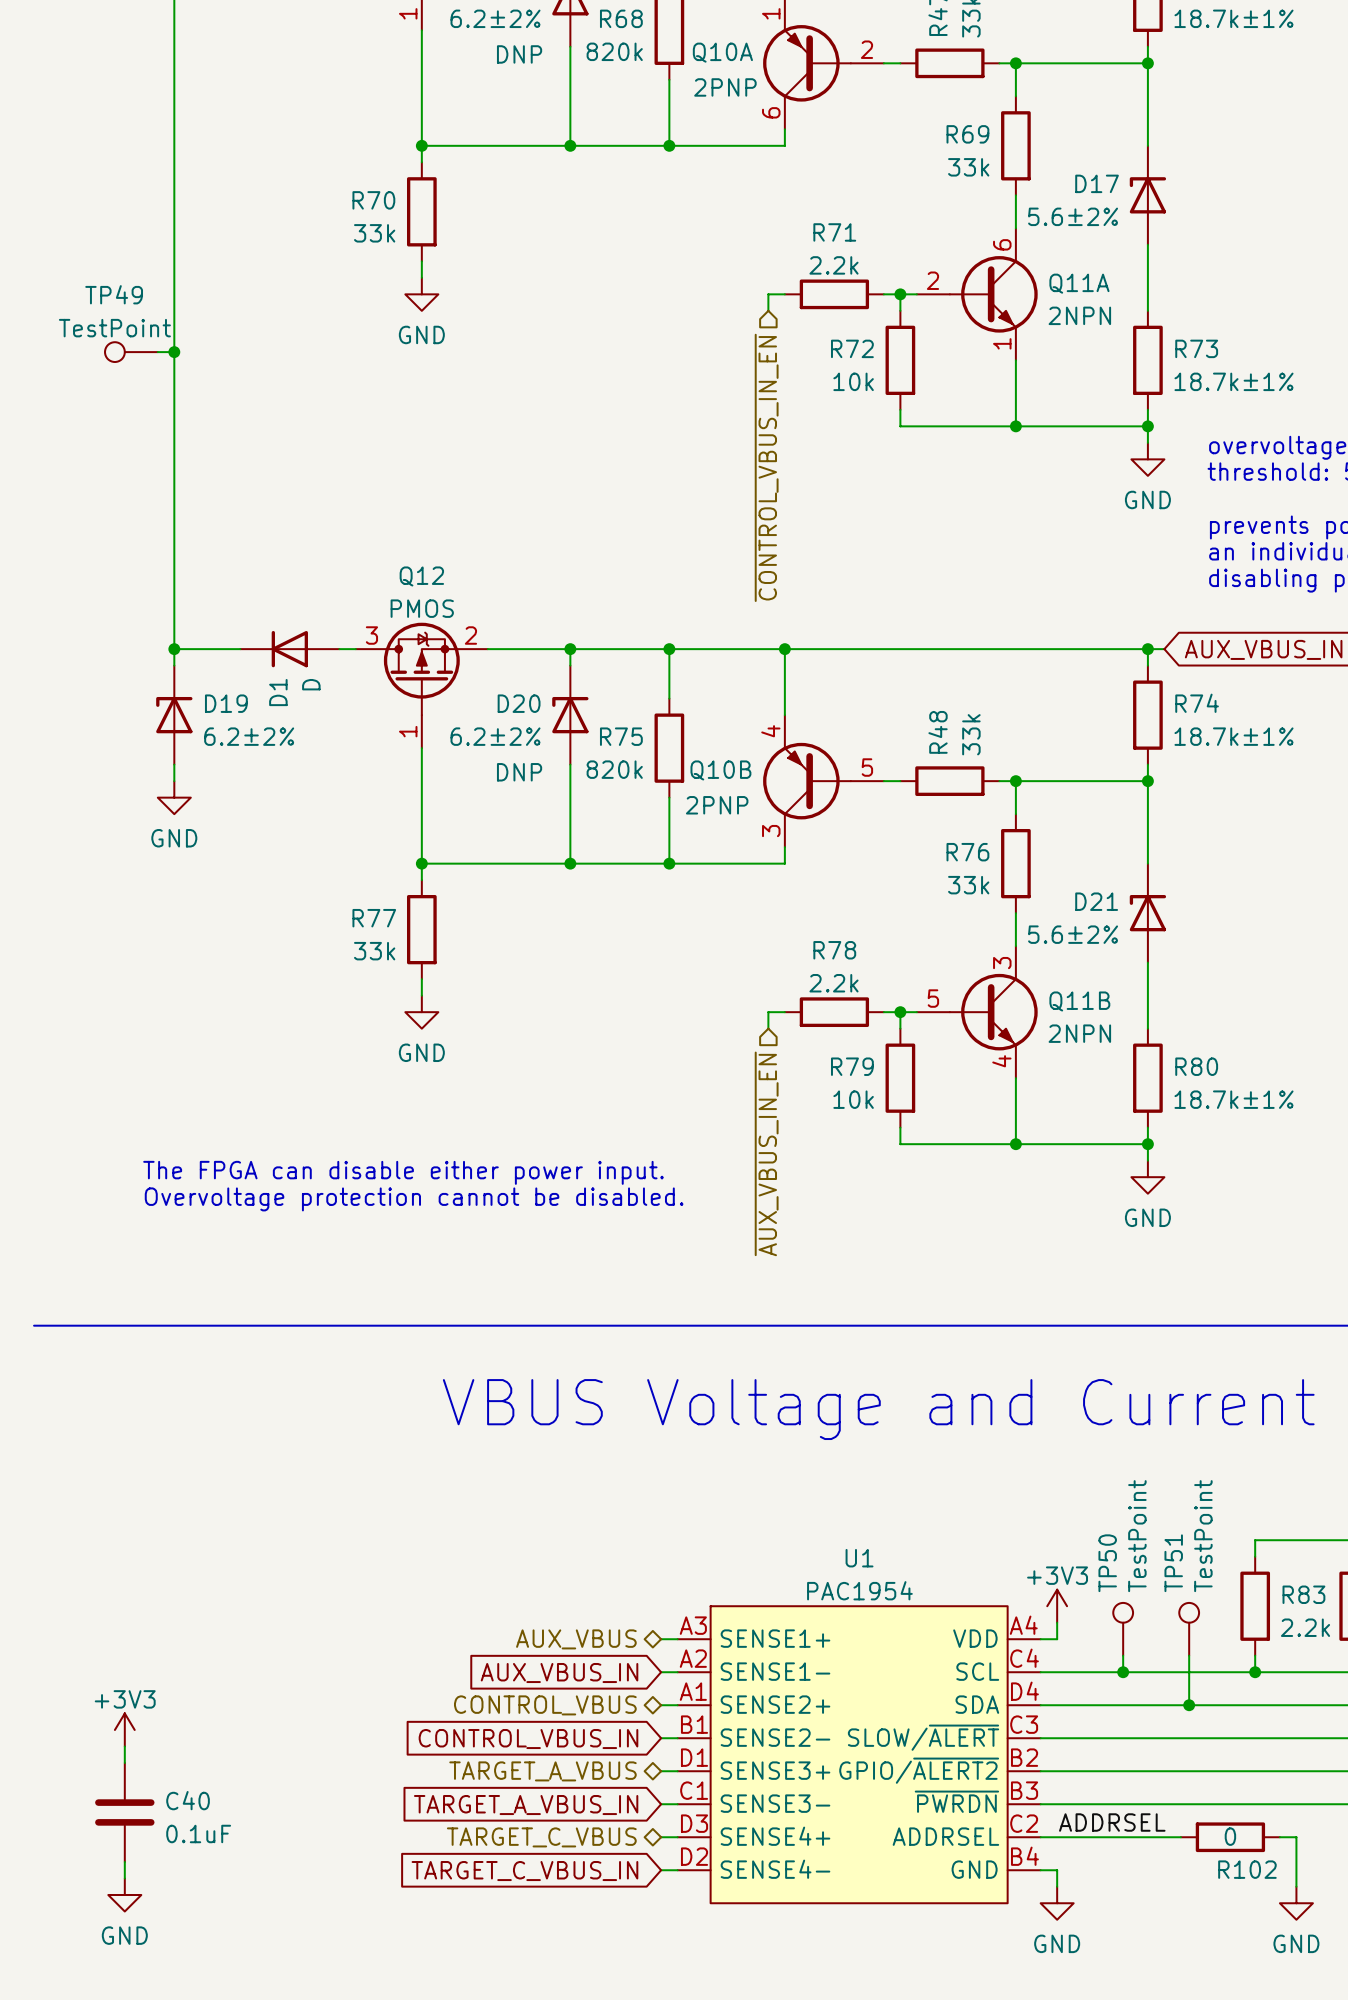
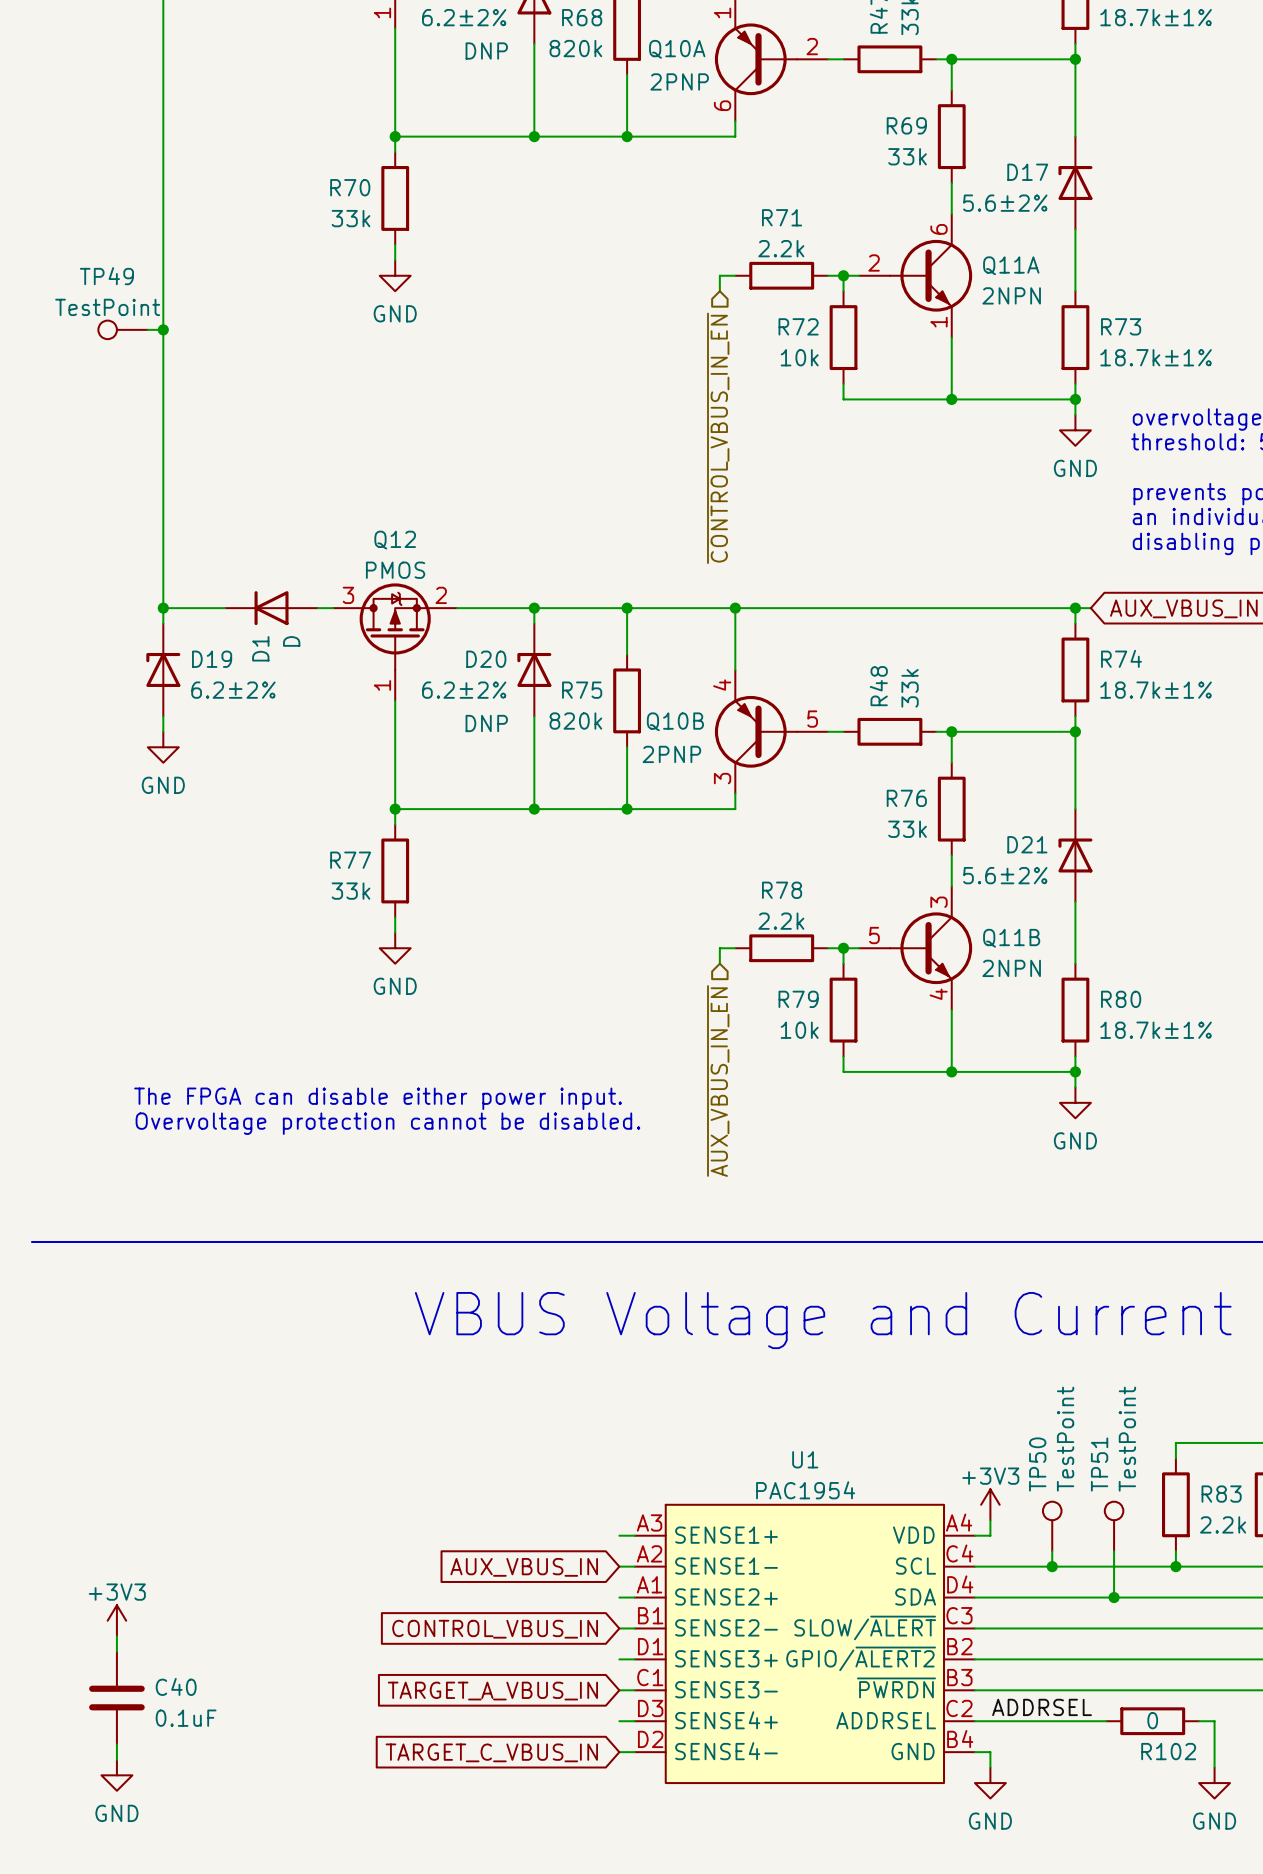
hierarchical label: AUX_VBUS (576, 1639) -> none
hierarchical label: CONTROL_VBUS (545, 1705) -> none
hierarchical label: TARGET_A_VBUS (542, 1771) -> none
hierarchical label: TARGET_C_VBUS (541, 1837) -> none

